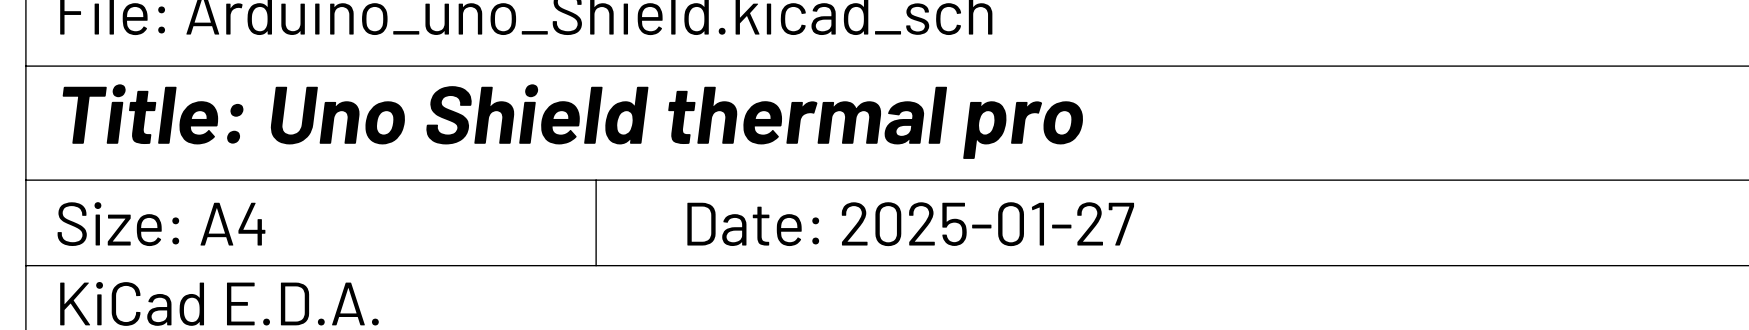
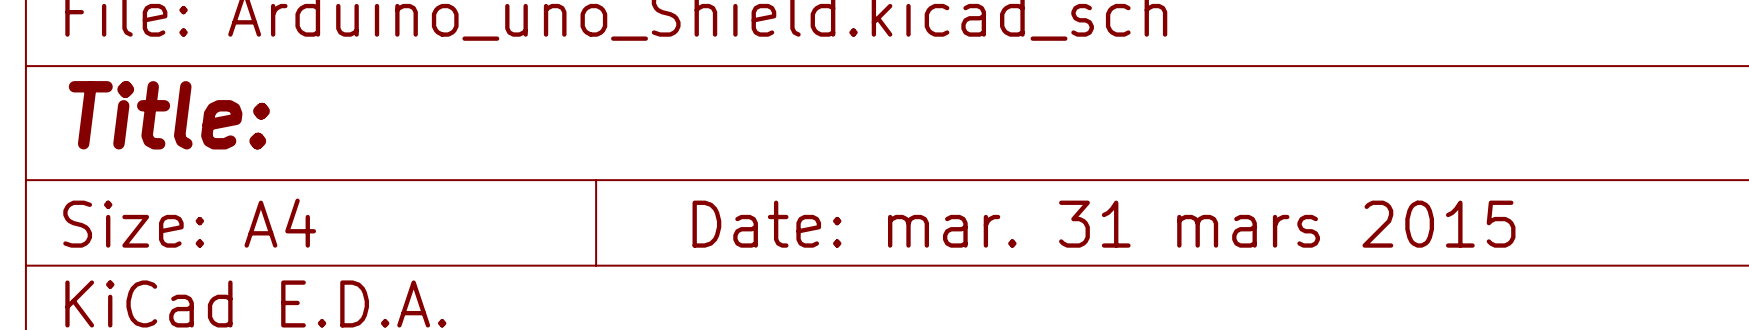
title block: Title: Uno Shield thermal pro (573, 121) -> Title: (169, 115)
title block: Date: 2025-01-27 (910, 224) -> Date: mar. 31 mars 2015 (1103, 224)

